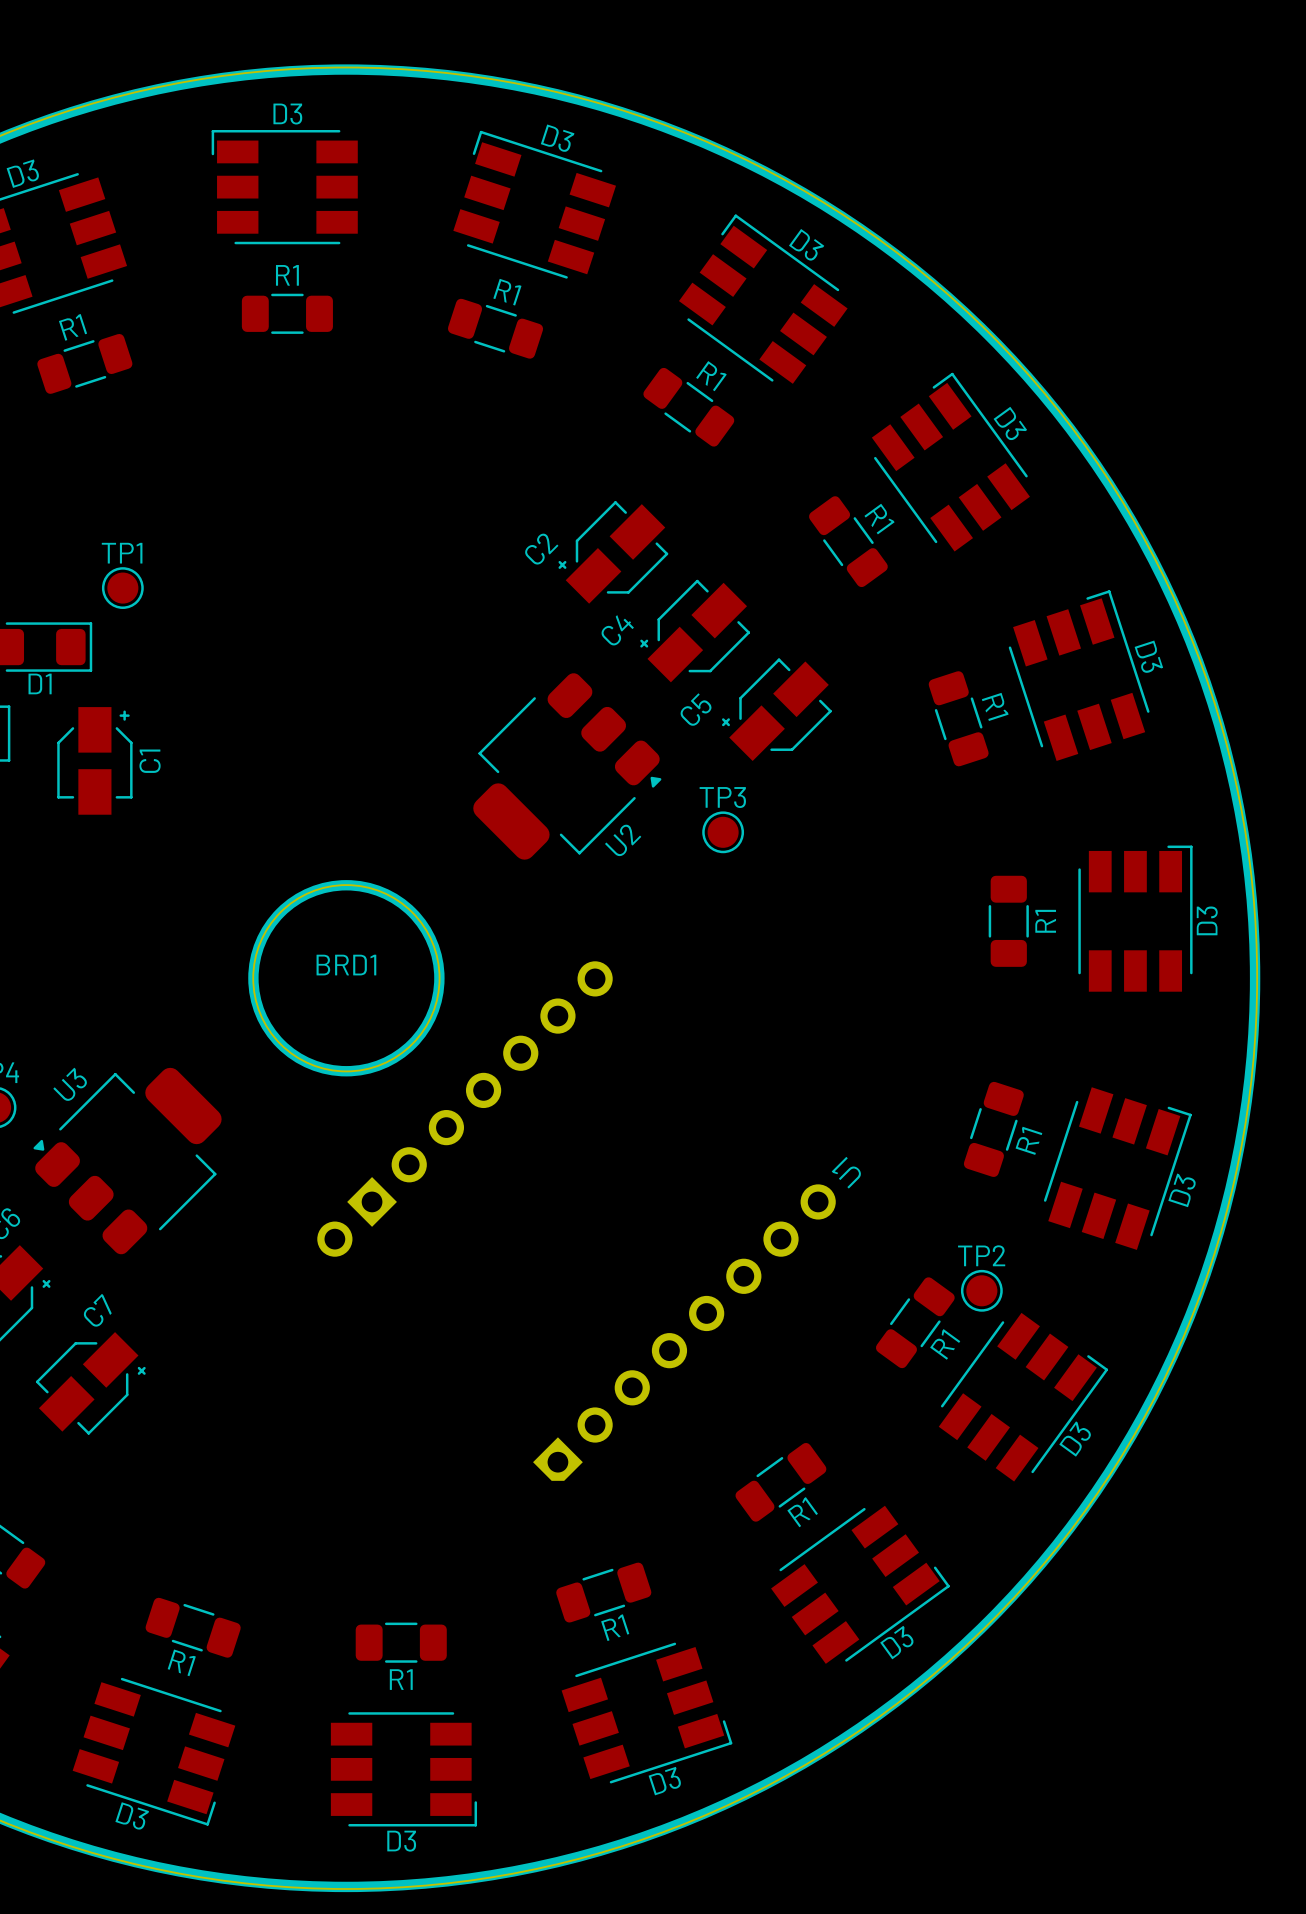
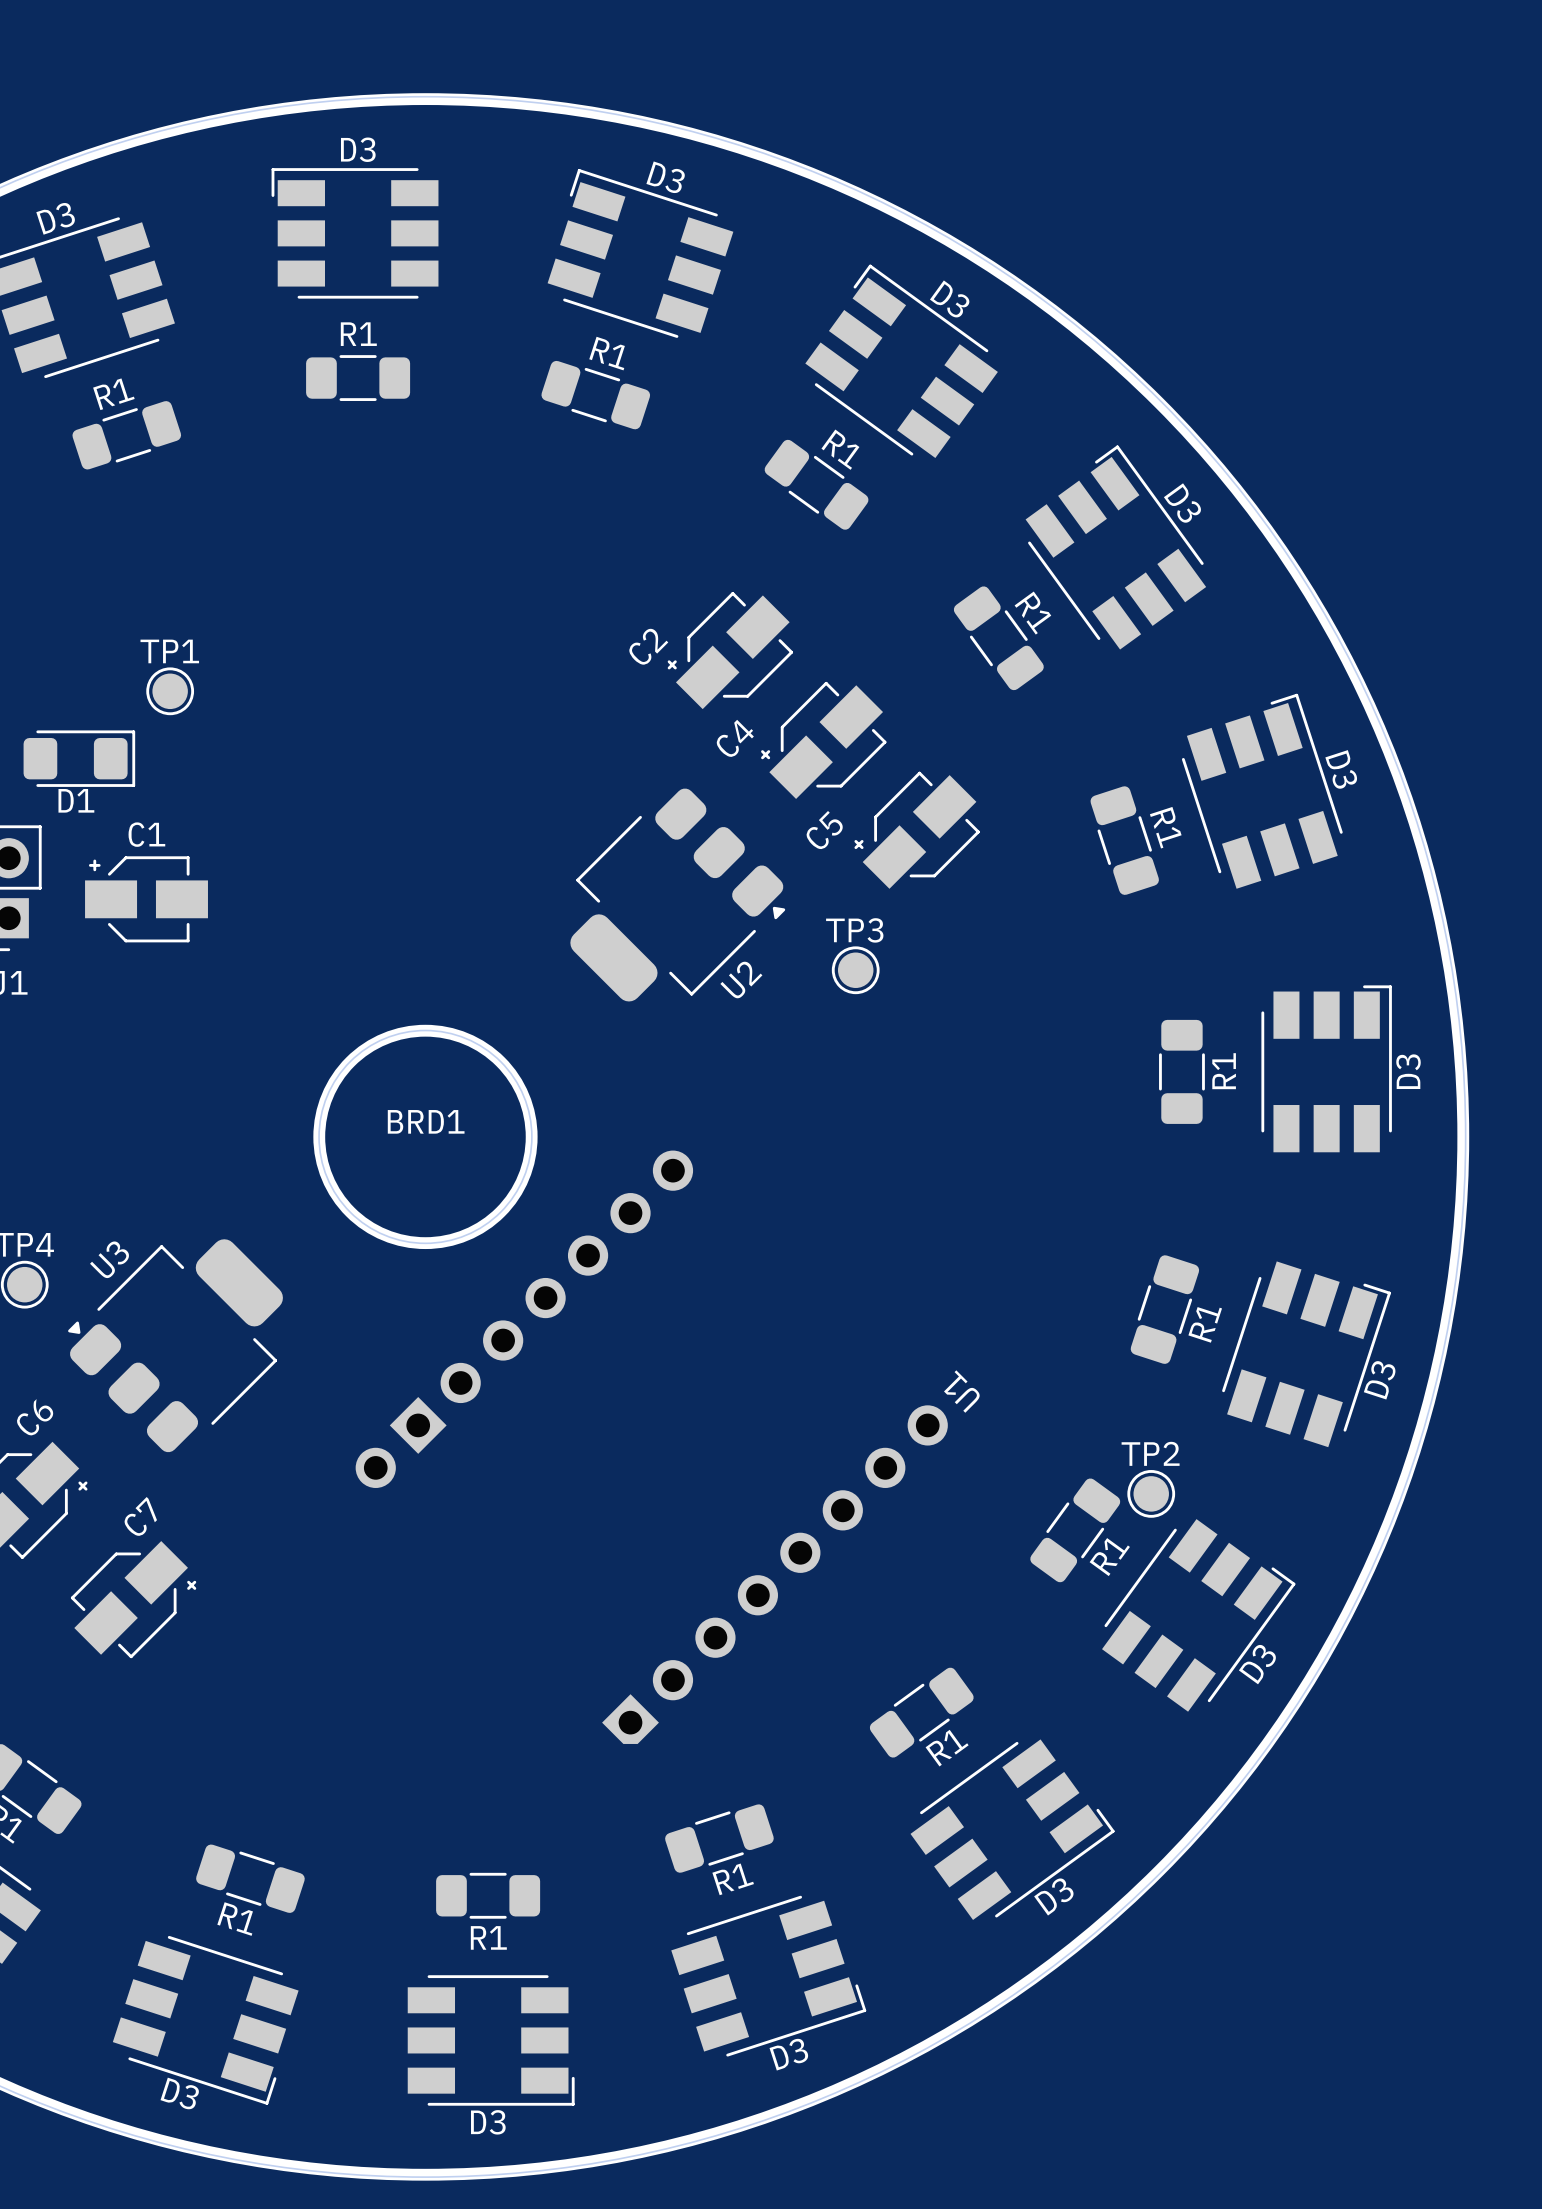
C1 rotation: 0° (94, 760) -> 90° counterclockwise (146, 899)
U1 position: (576, 1221) -> (651, 1447)

